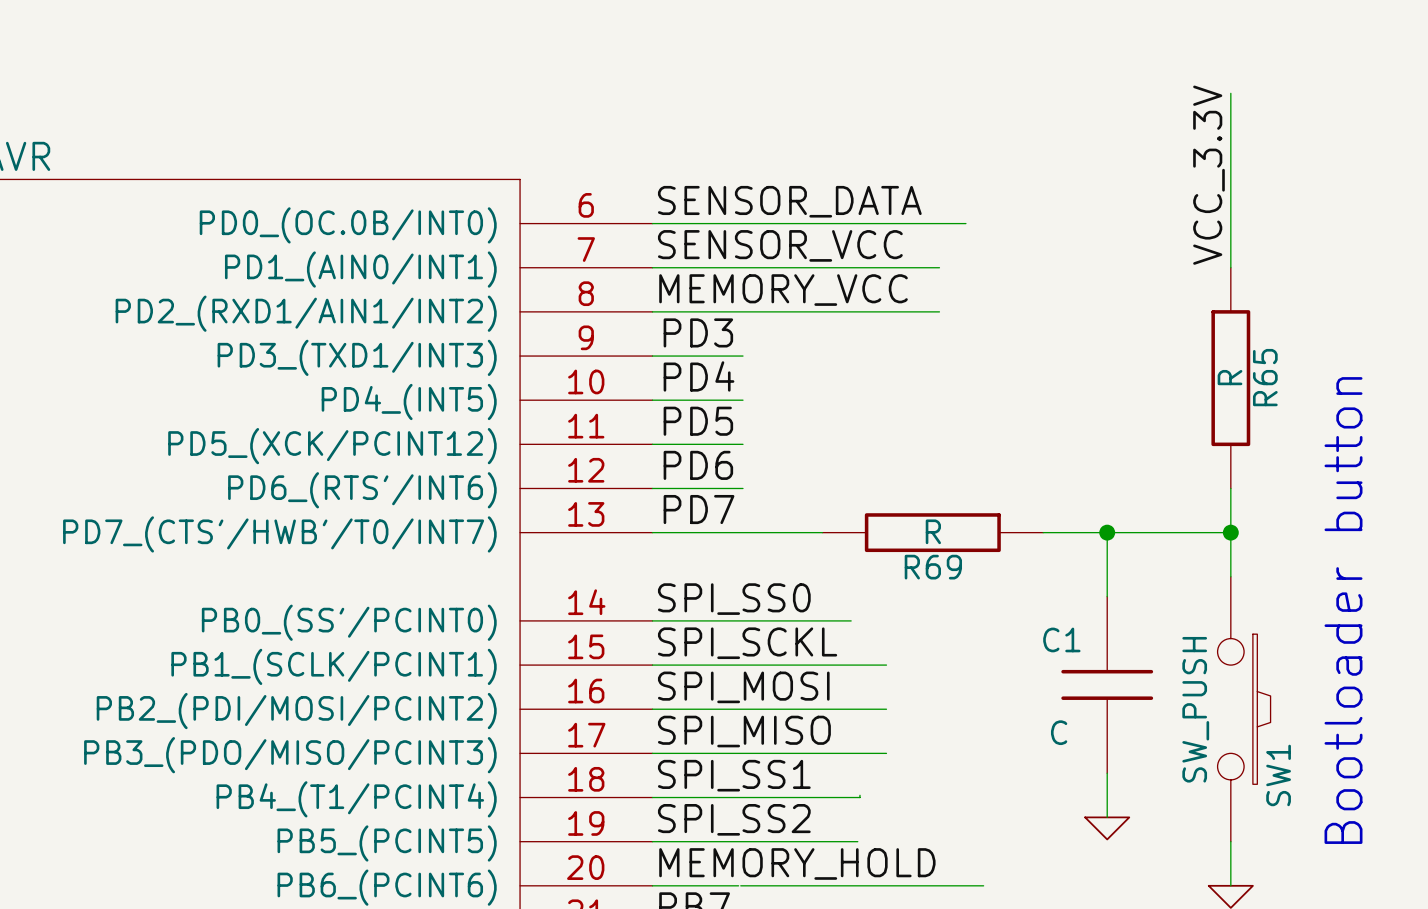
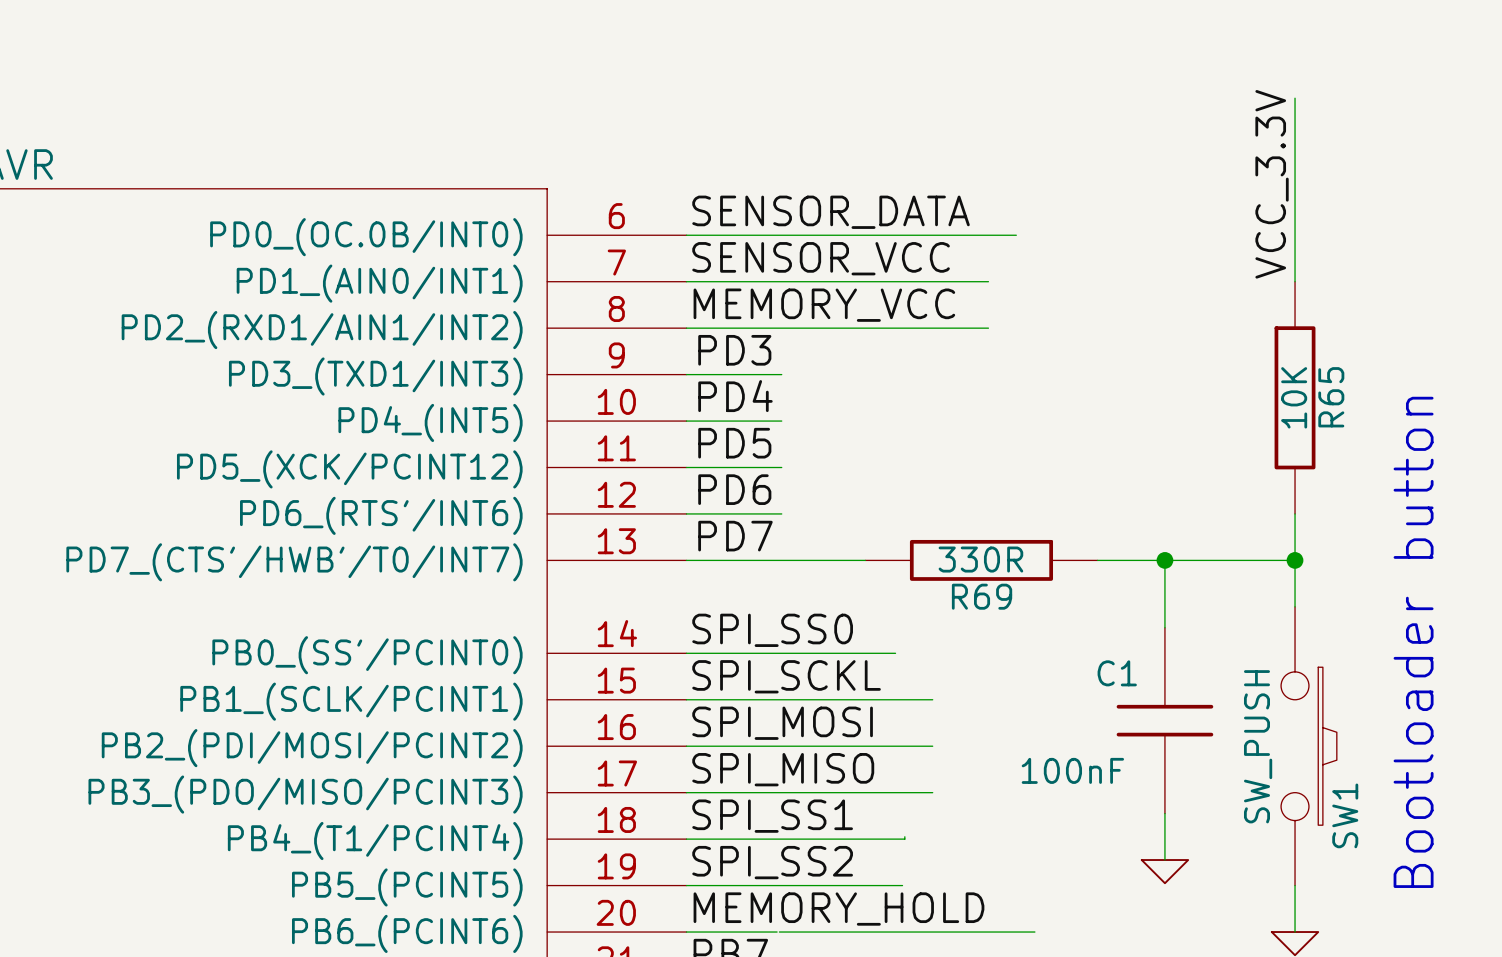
R65 value: R (1230, 377) -> 10K (1294, 397)
R69 value: R (933, 531) -> 330R (980, 559)
C1 value: C (1059, 732) -> 100nF (1072, 770)

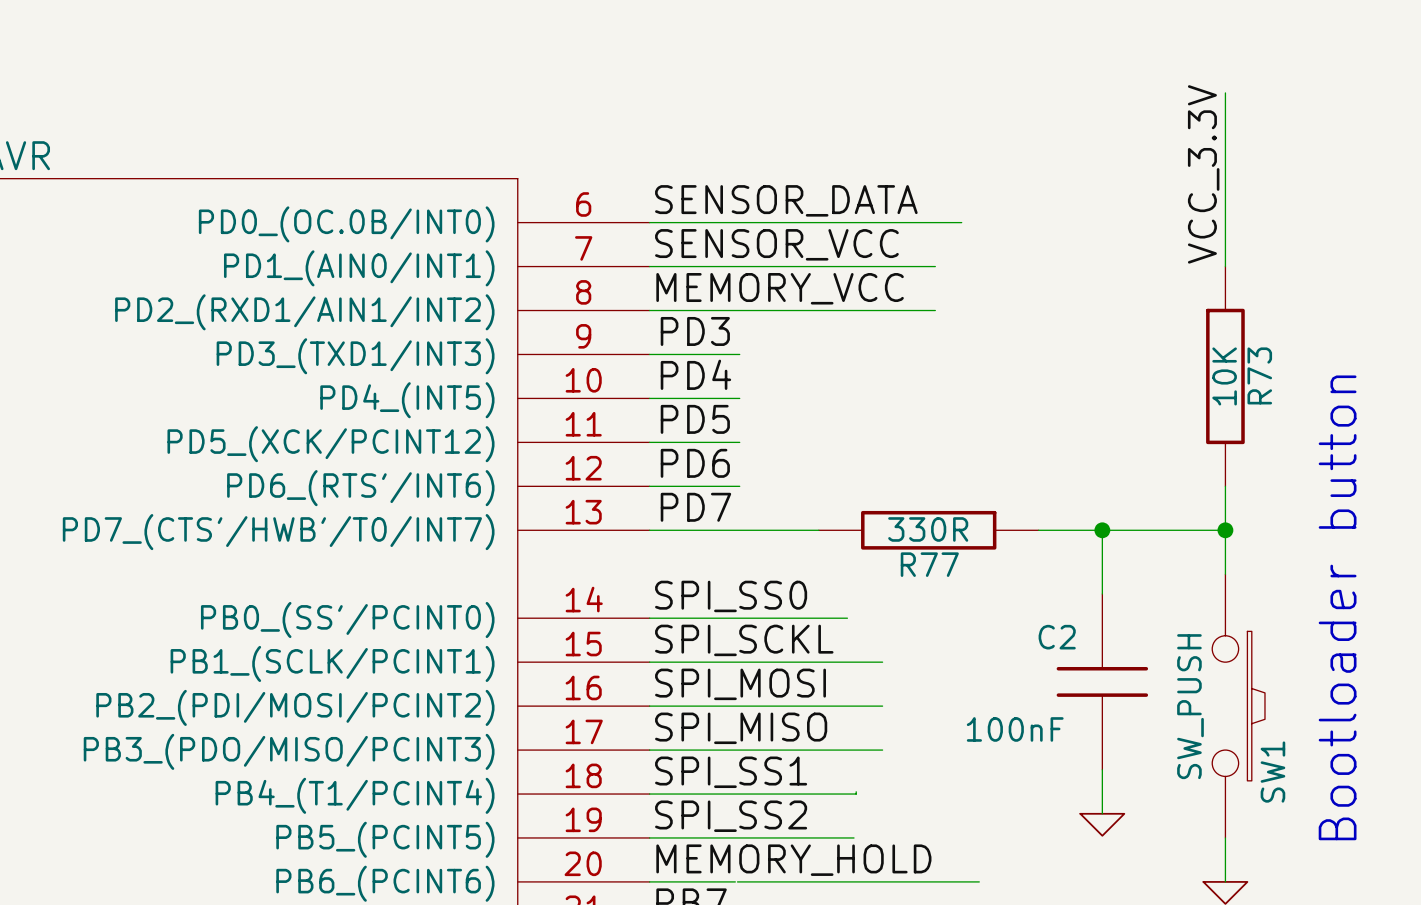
R65 name: R65 (1331, 397) -> R73 (1259, 375)
R69 name: R69 (982, 596) -> R77 (929, 564)
C1 name: C1 (1117, 673) -> C2 (1057, 637)

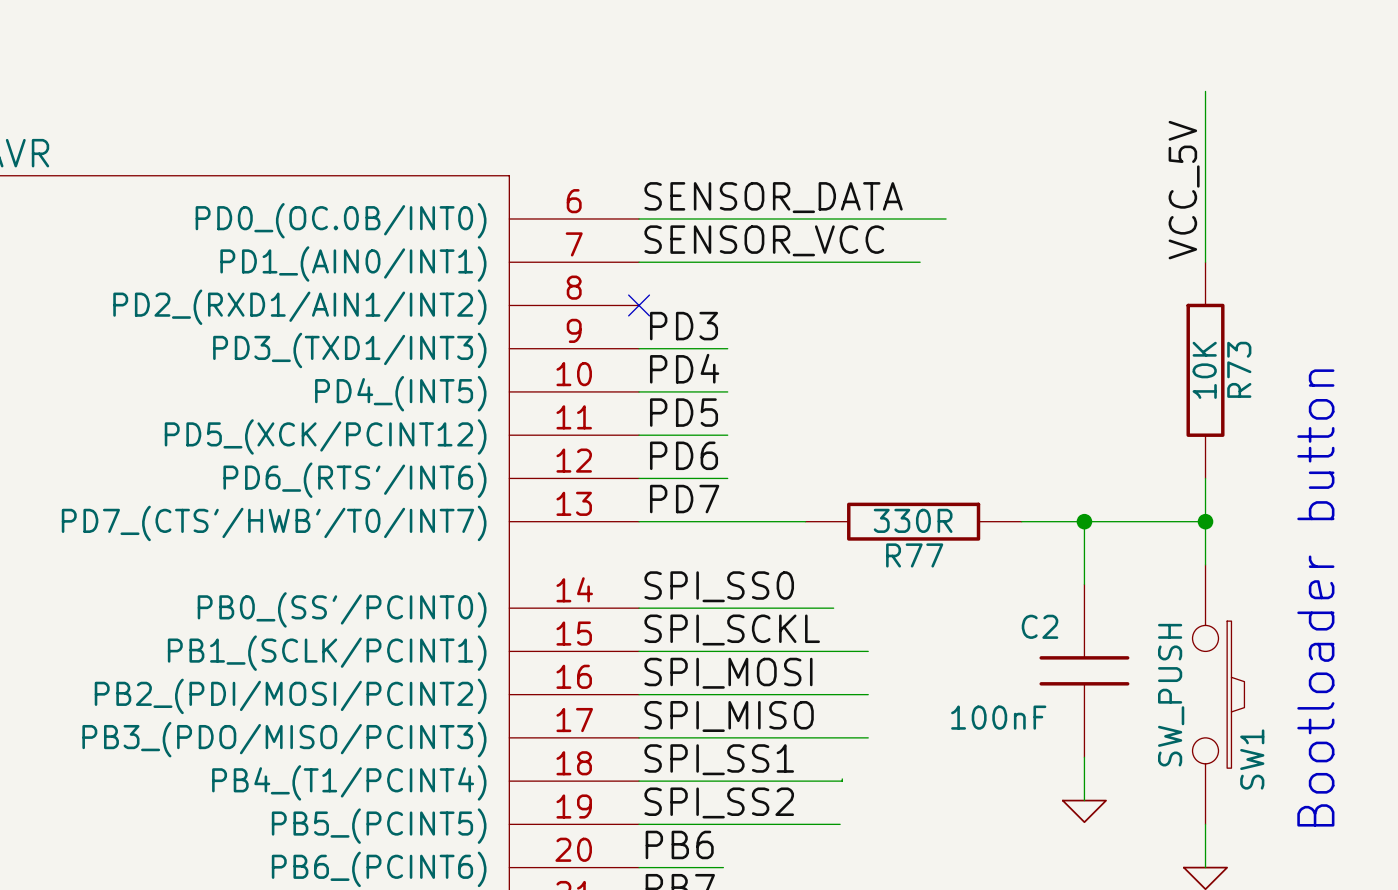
label: VCC_3.3V (1203, 174) -> VCC_5V (1184, 190)
label: MEMORY_VCC (780, 288) -> none
wire: (649, 310) (935, 310) -> none
no-connect mark: none -> (639, 305)
label: MEMORY_HOLD (793, 860) -> PB6 (679, 844)
wire: (737, 881) (979, 881) -> none

